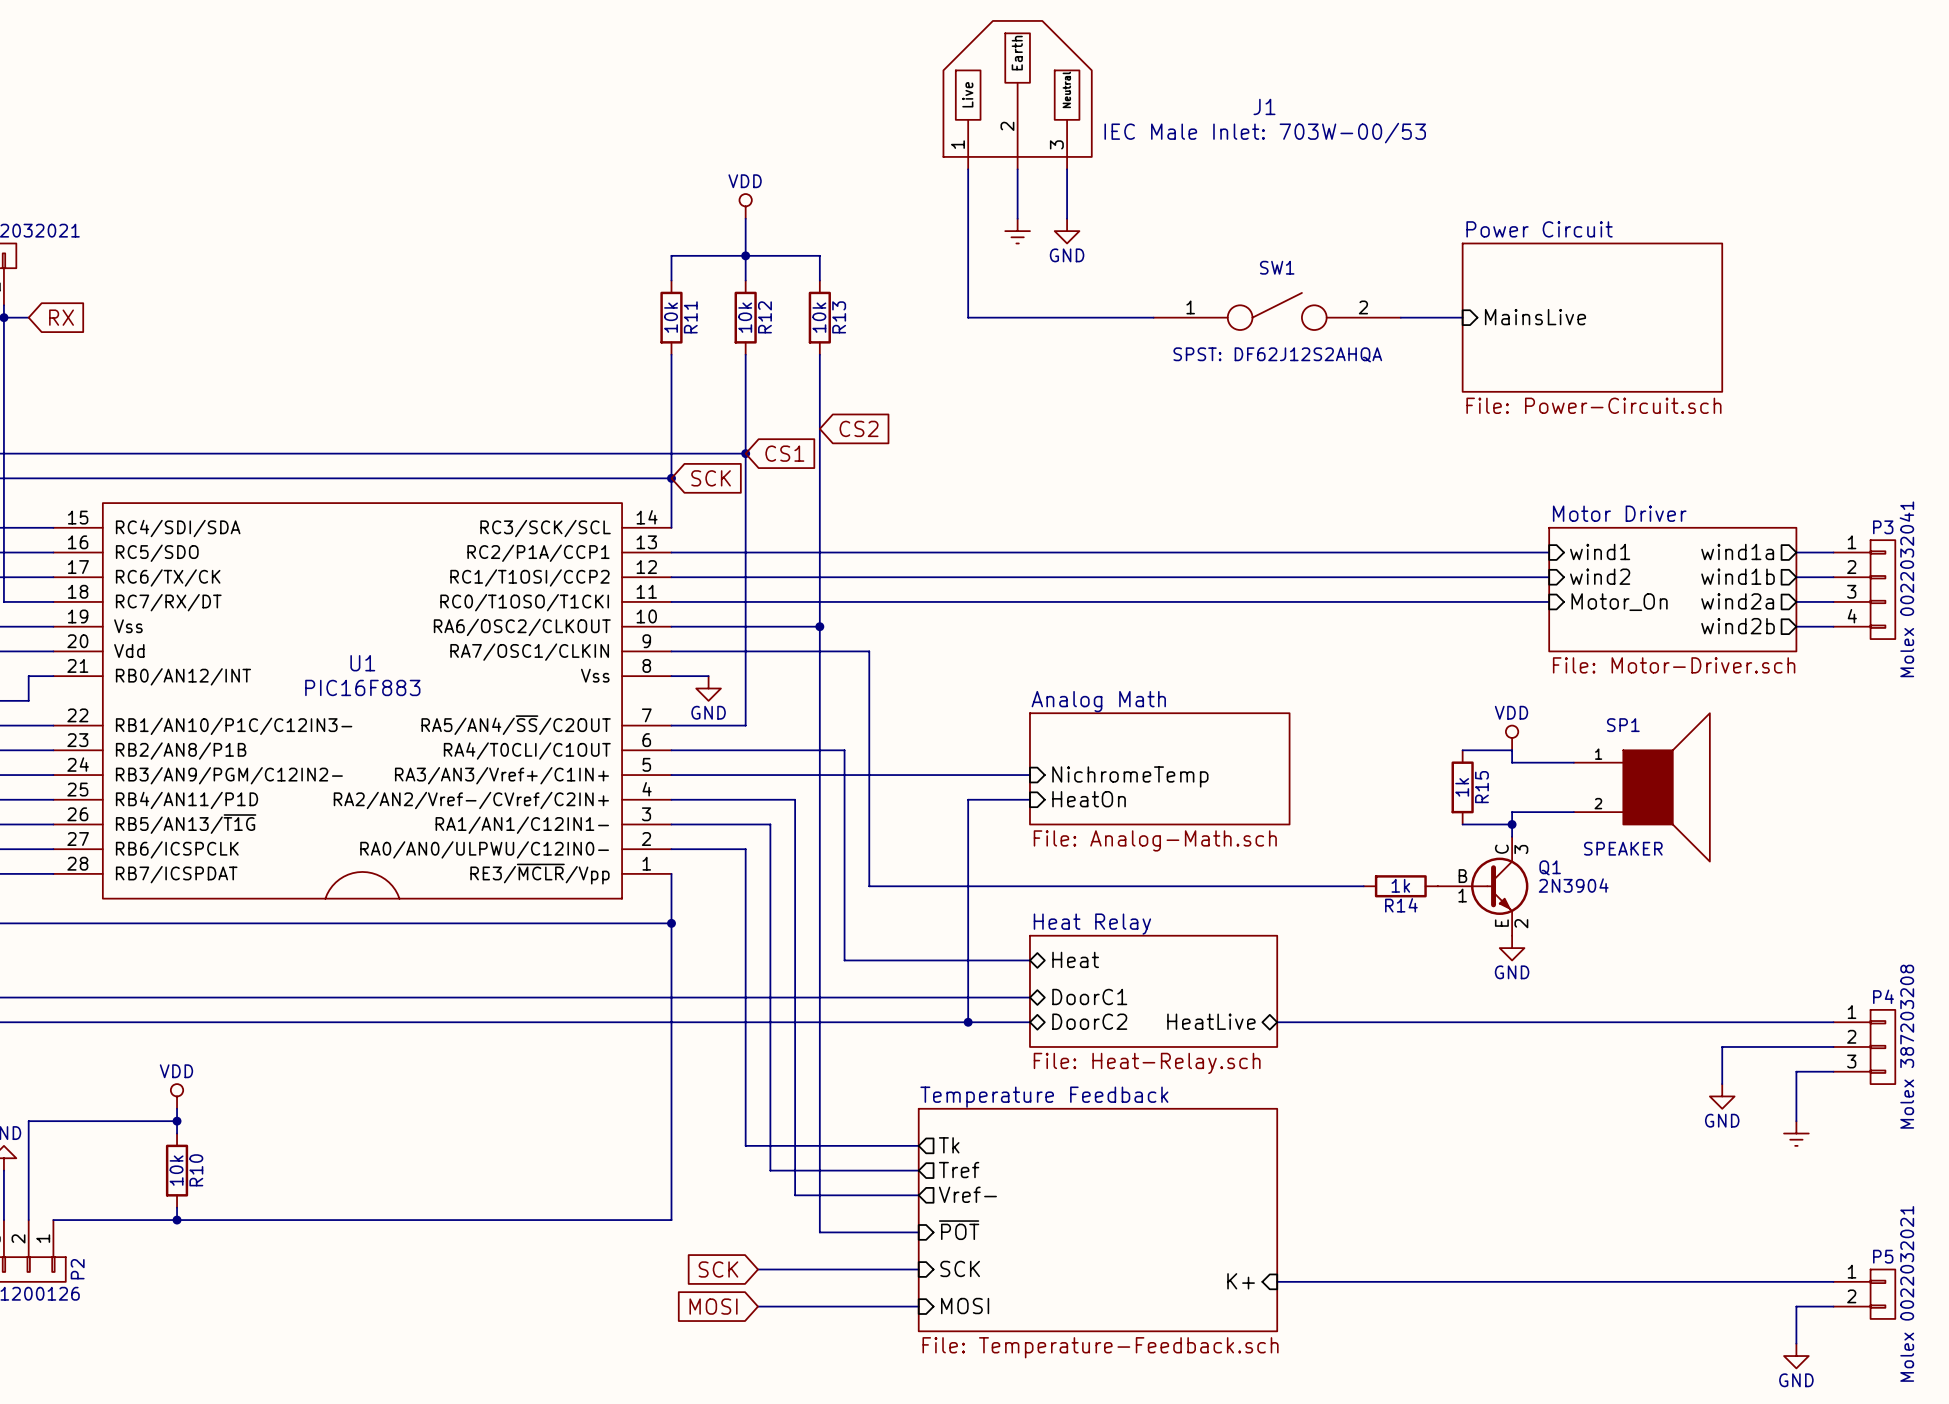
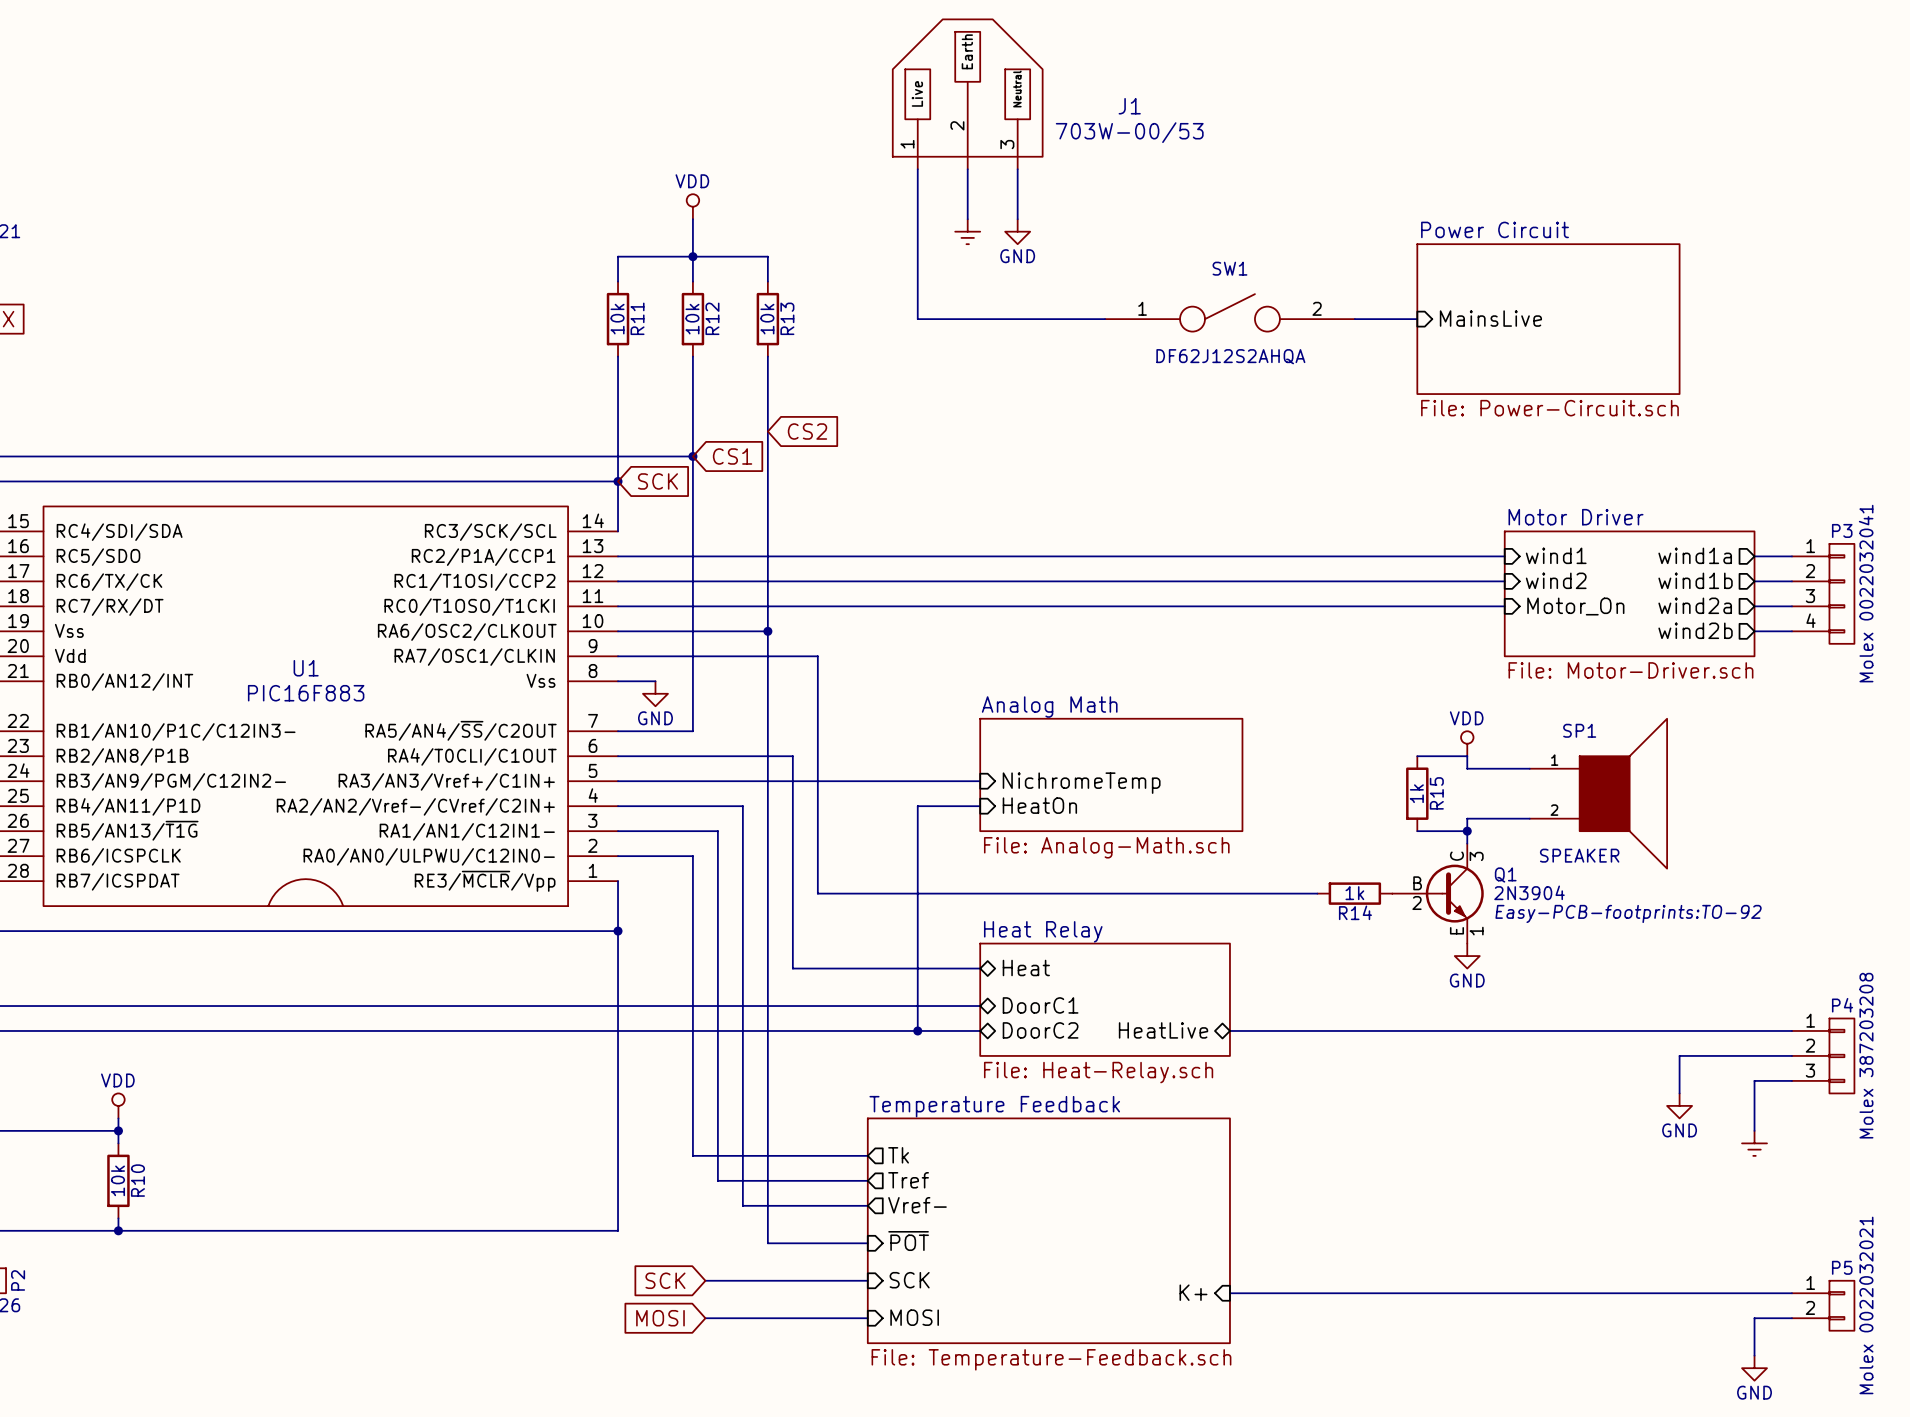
J1 name position: J1 (1264, 106) -> J1 (1129, 106)
J1 value: IEC Male Inlet: 703W-00/53 (1265, 133) -> 703W-00/53 (1129, 132)
SW1 value: SPST: DF62J12S2AHQA (1277, 354) -> DF62J12S2AHQA (1230, 356)
Q1 pin number: 1 (1462, 895) -> 2 (1417, 902)
Q1 text: none -> Easy-PCB-footprints:TO-92 (1628, 913)
Q1 pin number: 2 (1521, 923) -> 1 (1476, 931)

